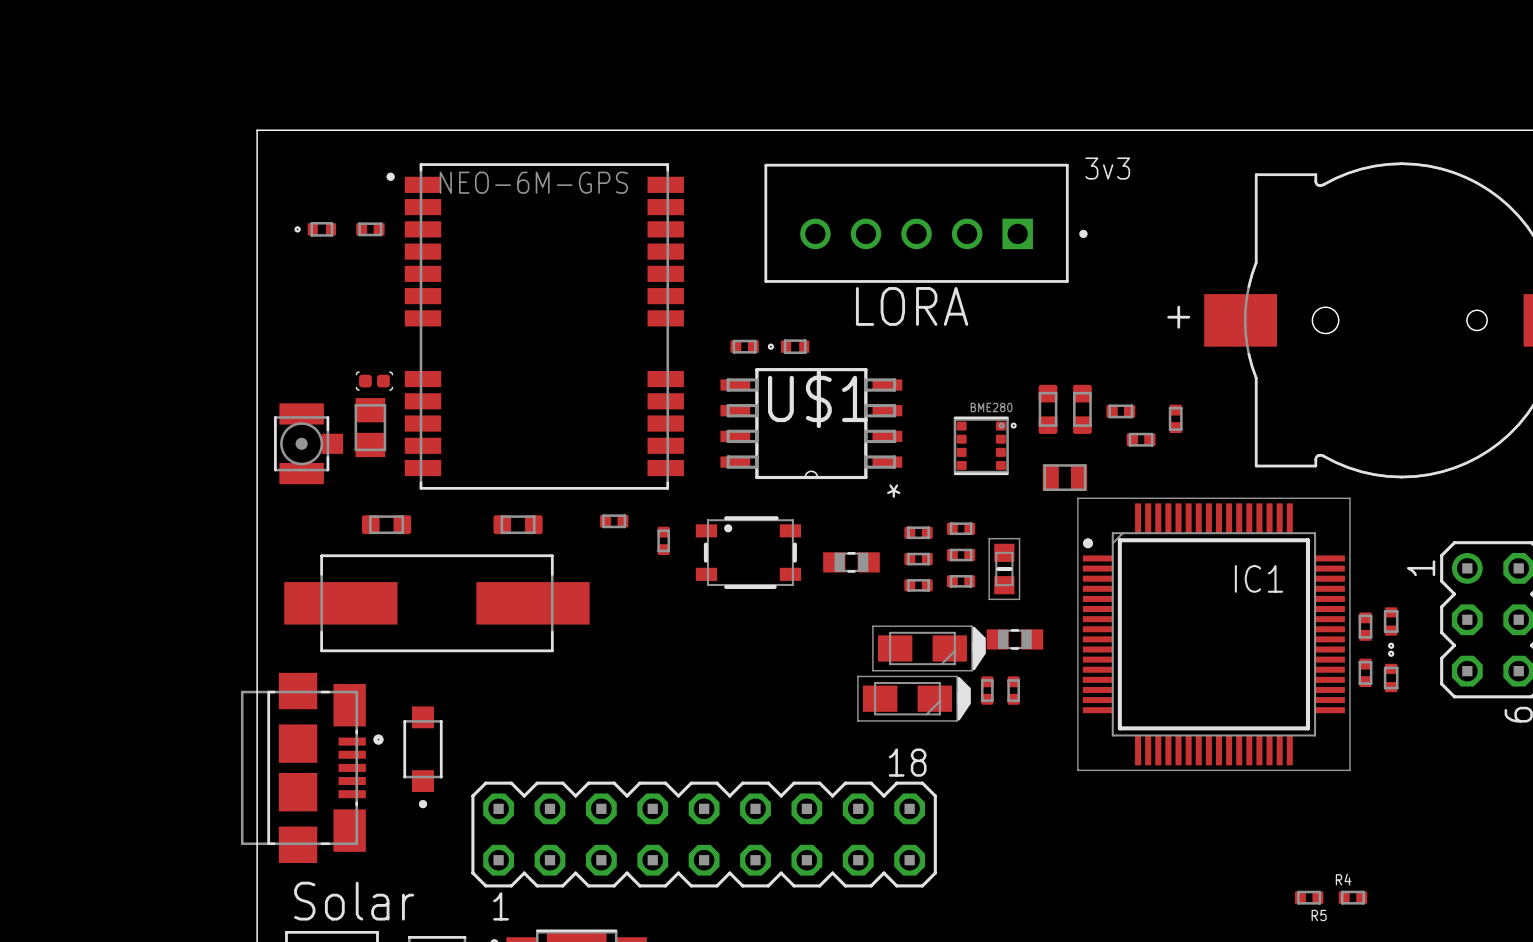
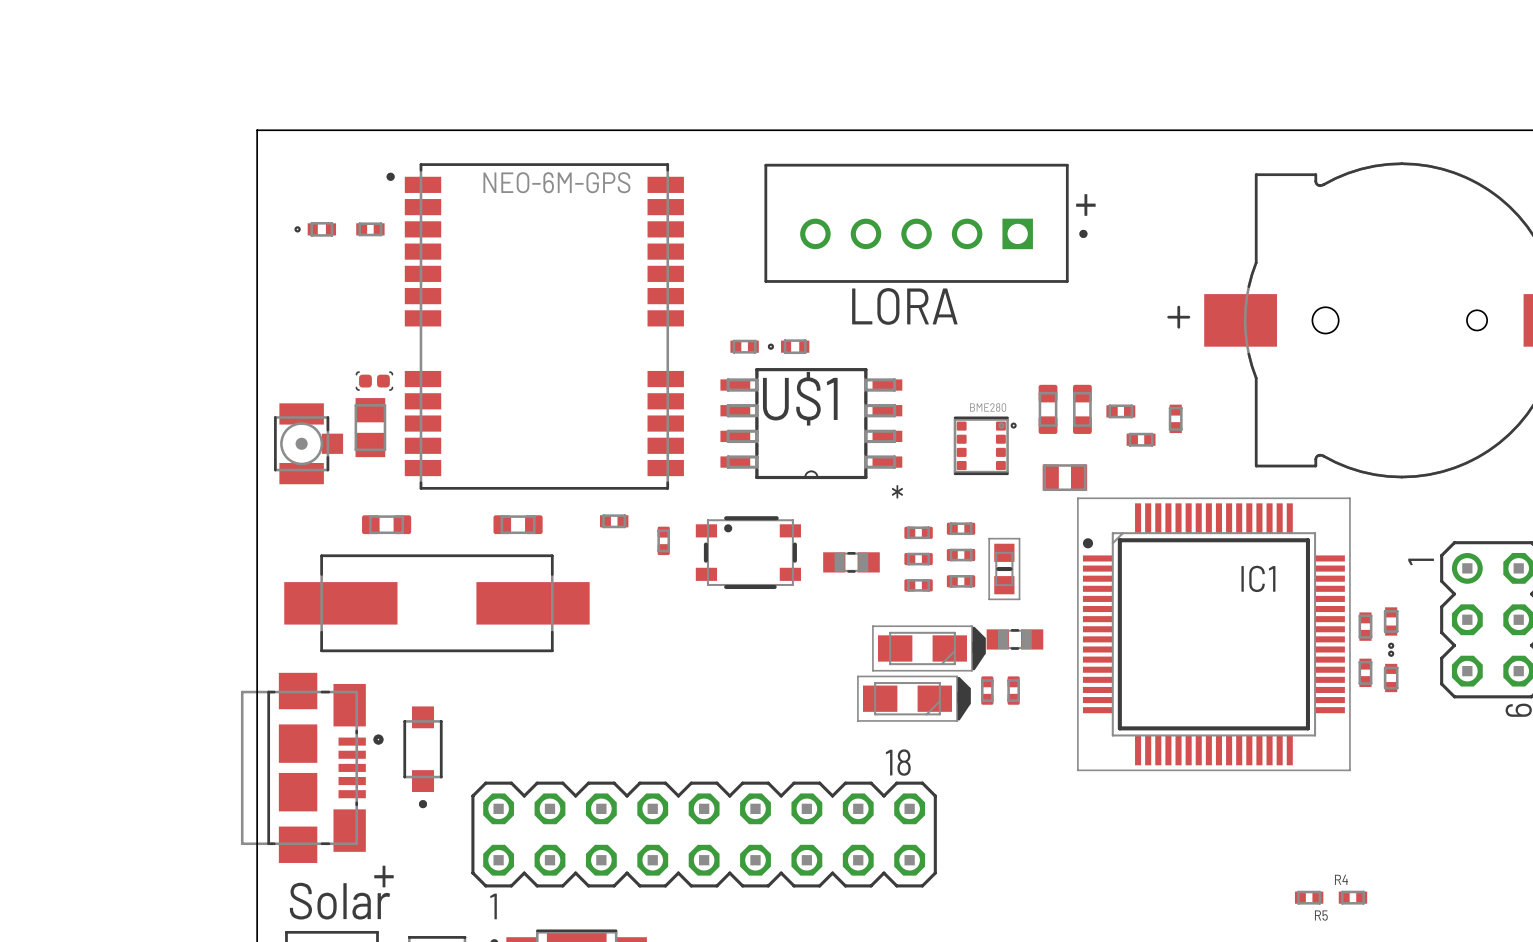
text: 3v3 (1107, 168) -> none
text: none -> + (1085, 204)
text: none -> + (383, 876)

